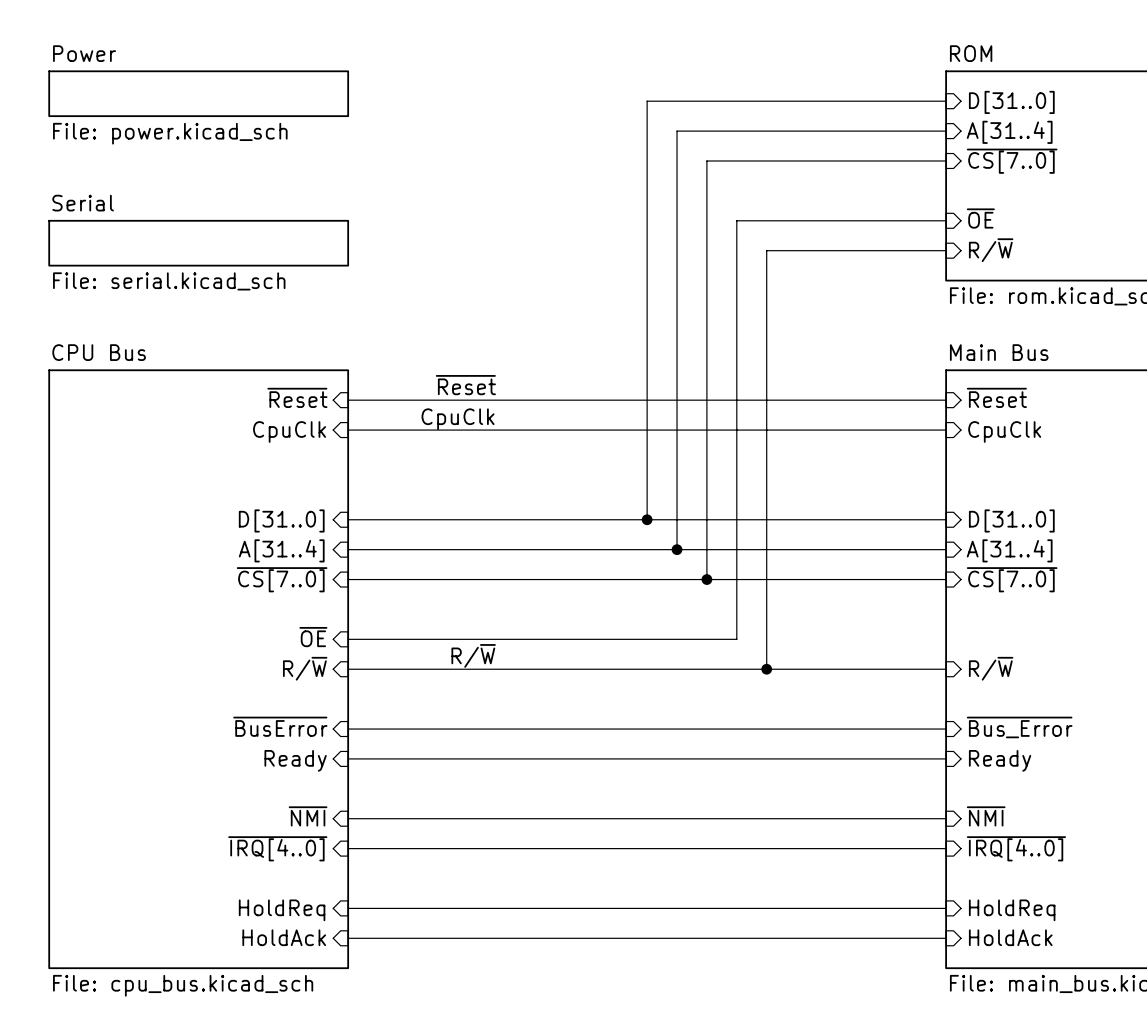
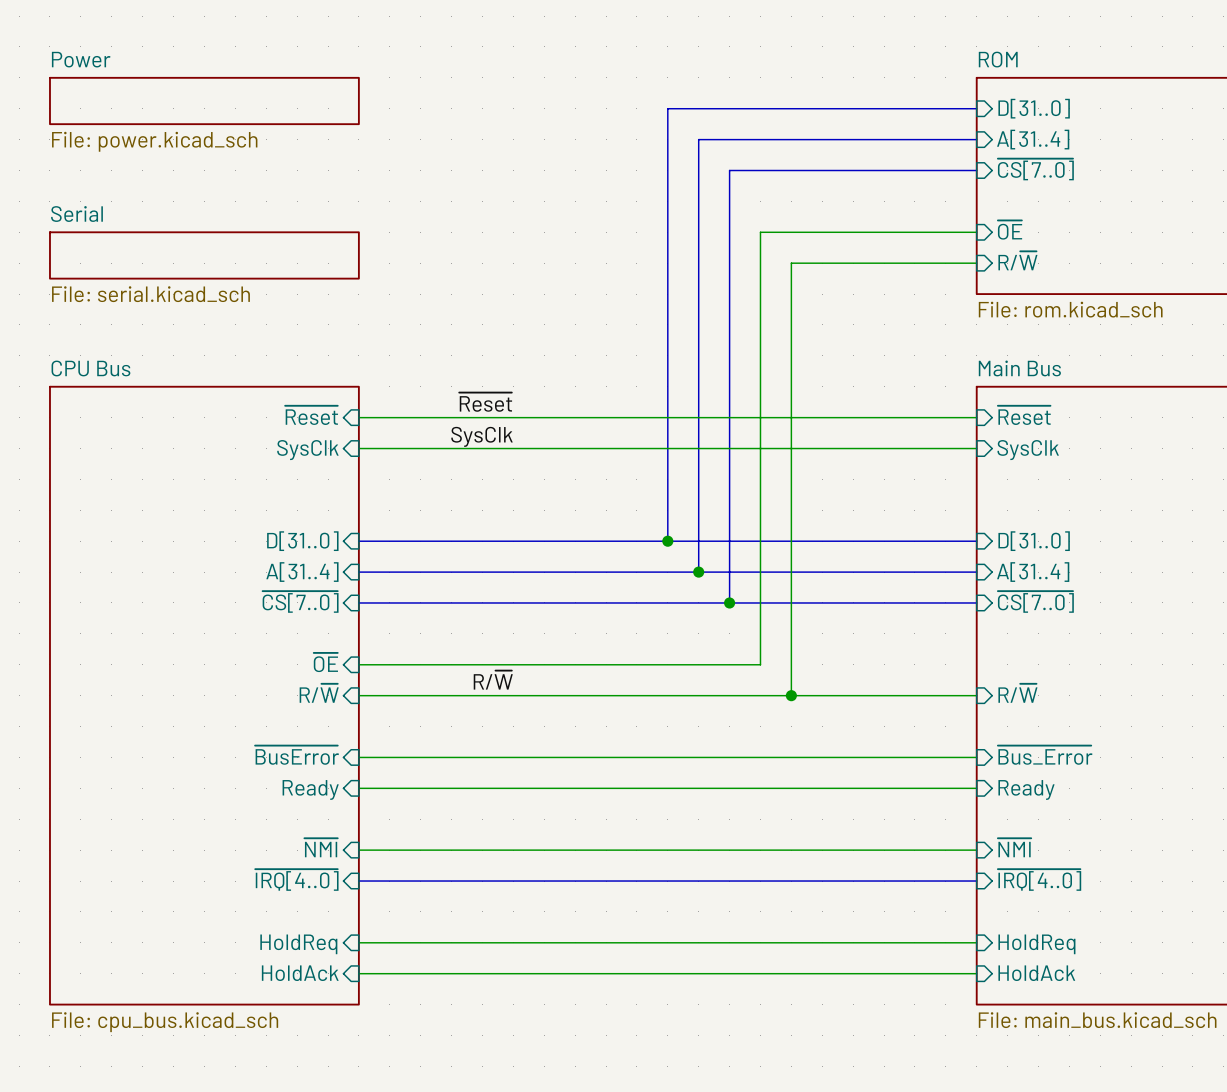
label: CpuClk (458, 419) -> SysClk (481, 436)
sheet pin: CpuClk (289, 431) -> SysClk (307, 450)
sheet pin: CpuClk (1004, 431) -> SysClk (1028, 450)

